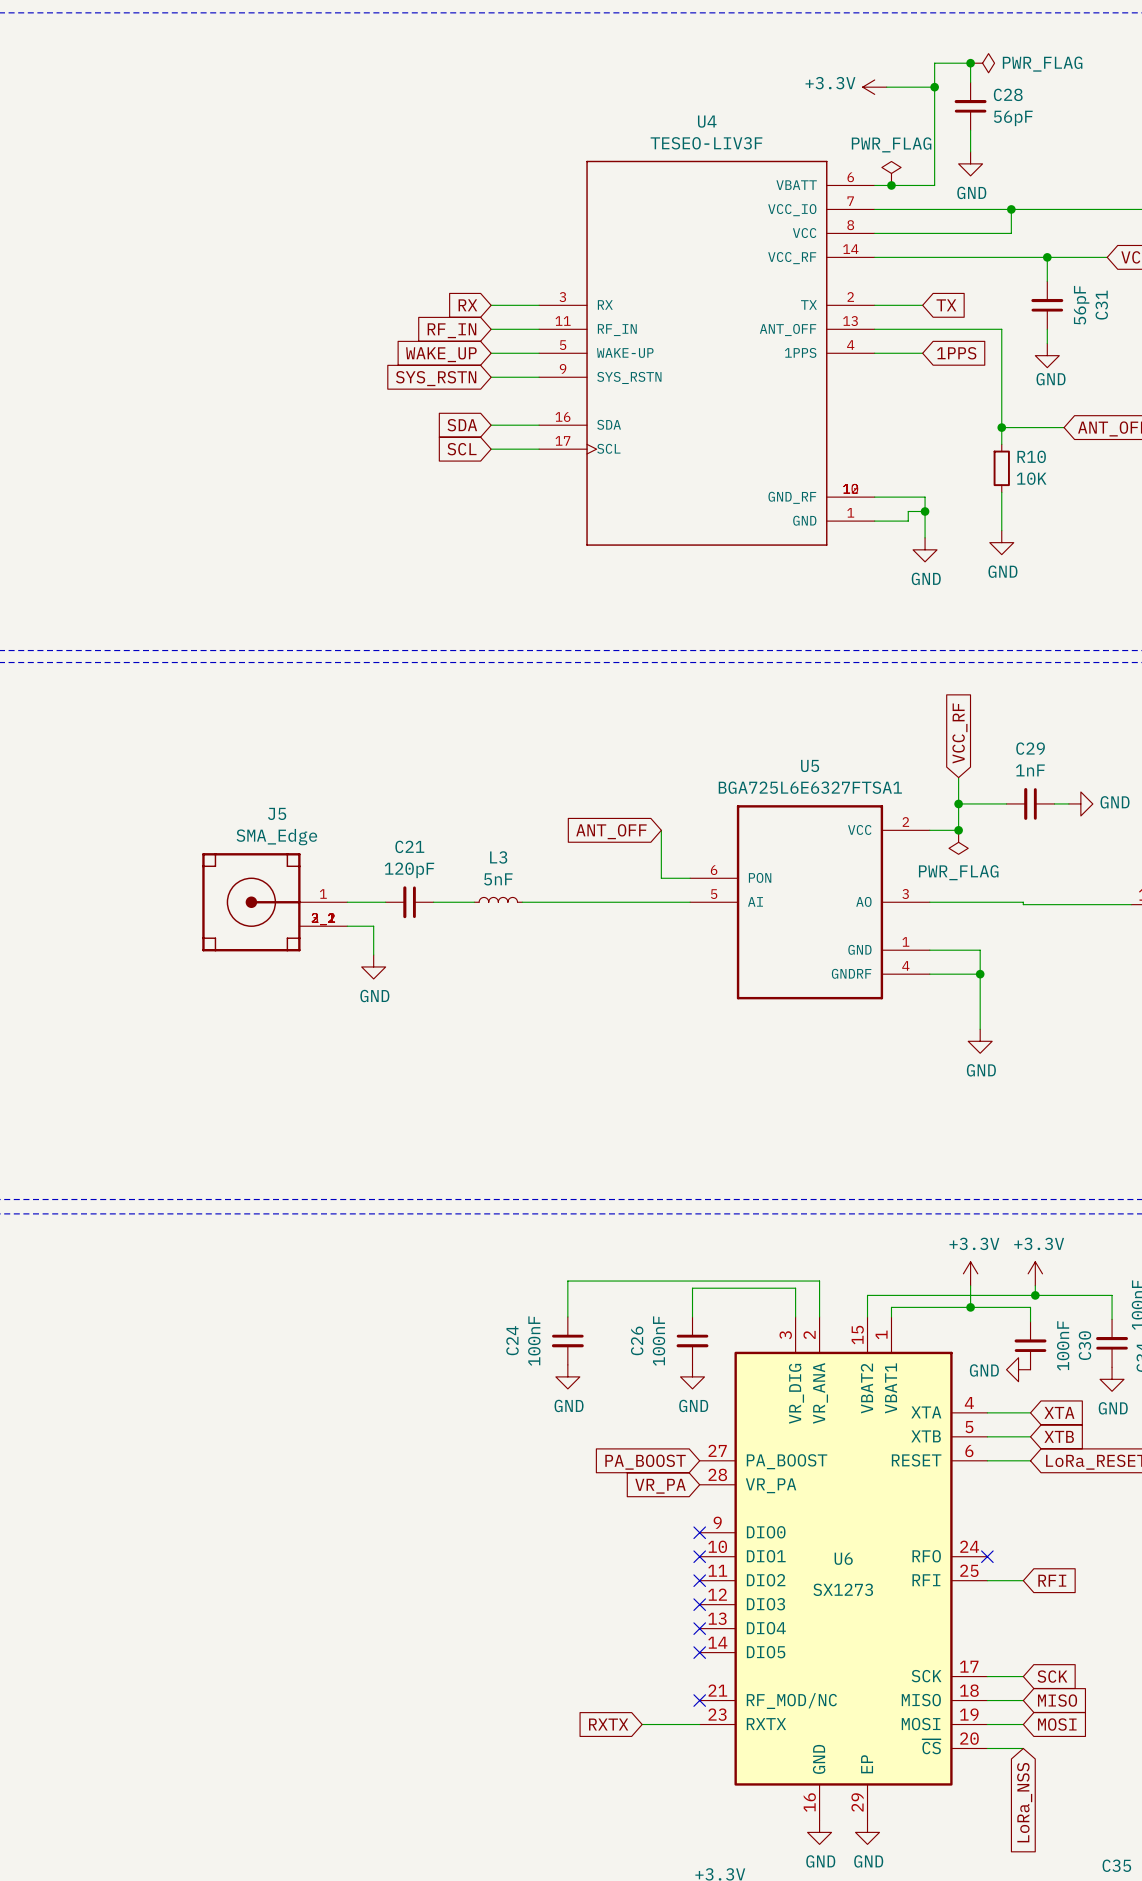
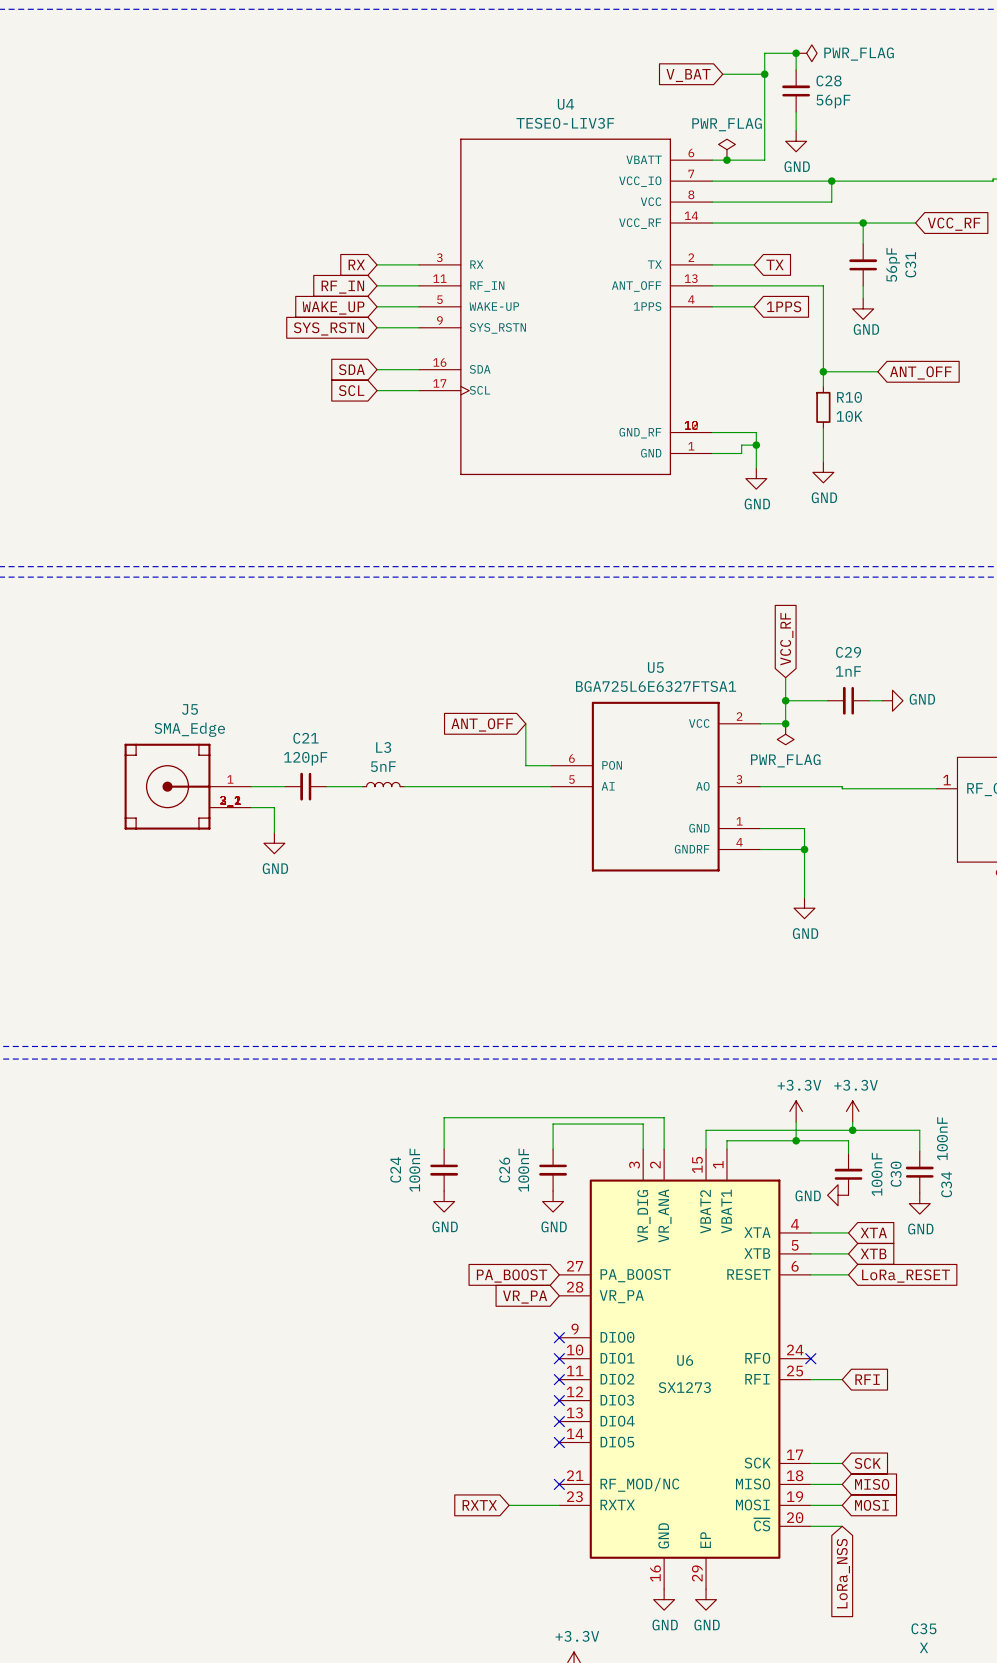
power symbol: +3.3V (874, 87) -> none
global label: none -> V_BAT (688, 75)

